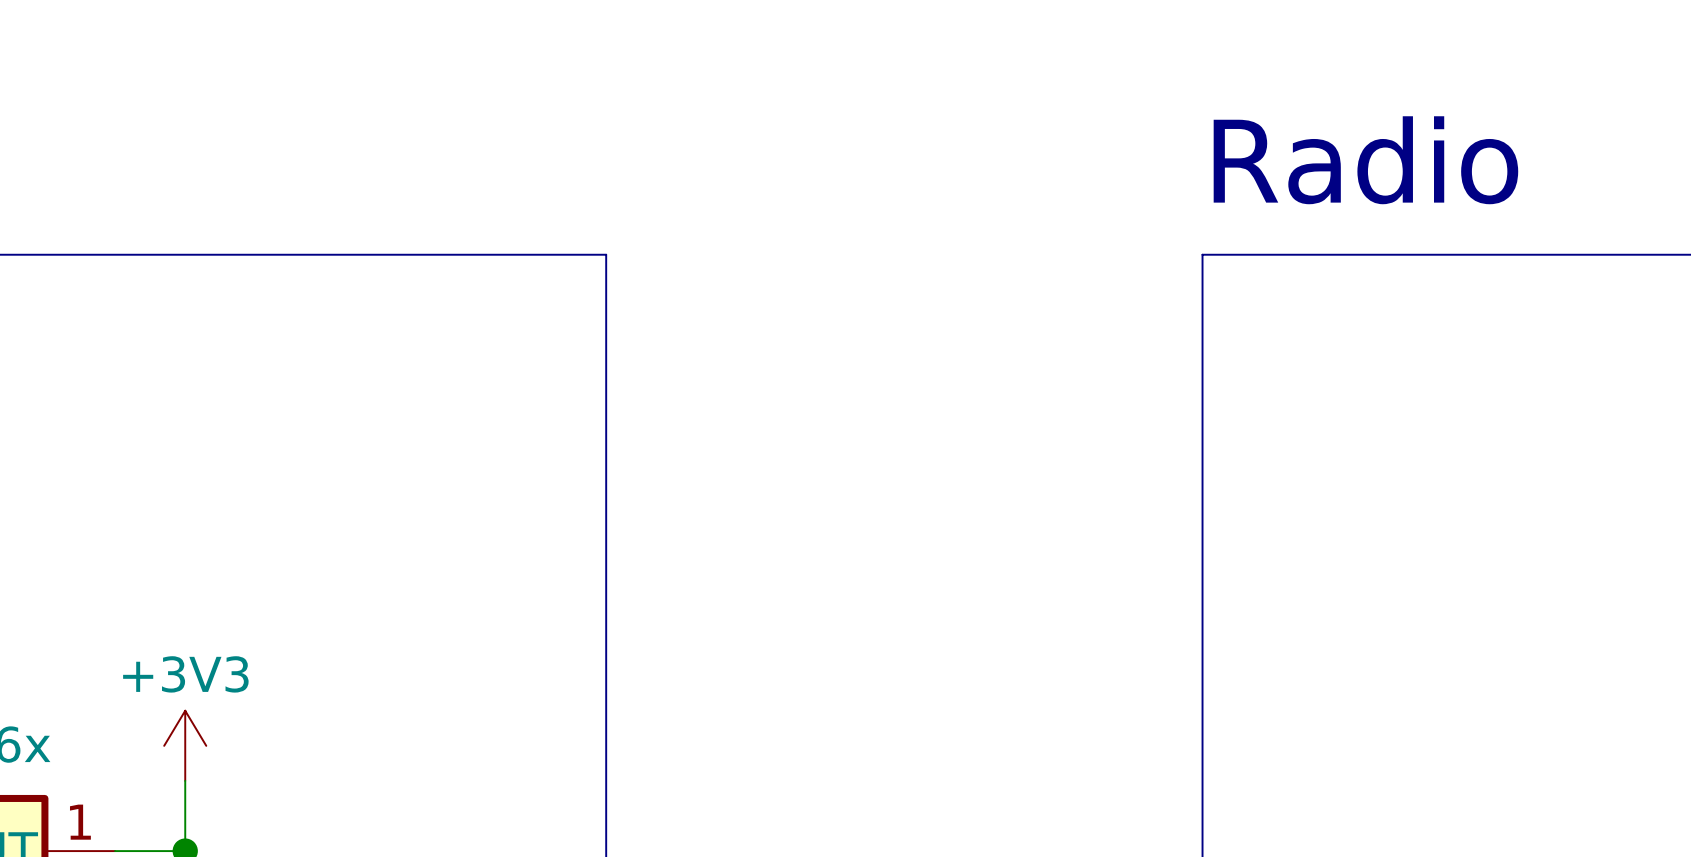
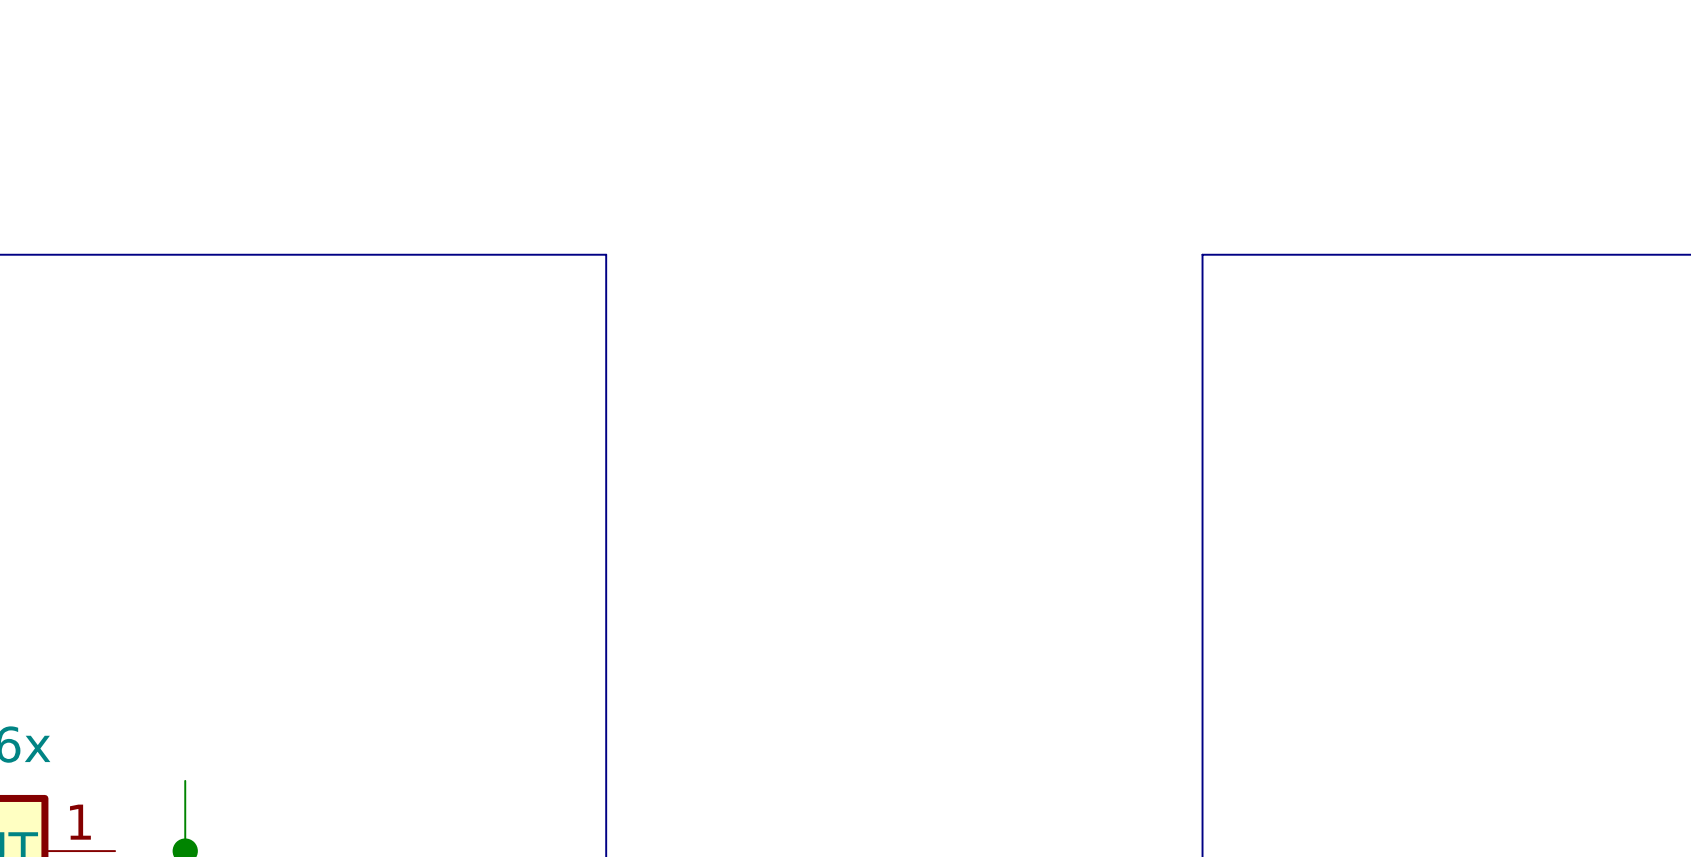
text: Radio (1365, 160) -> none
power symbol: +3V3 (185, 745) -> none
wire: (115, 851) (185, 851) -> none

